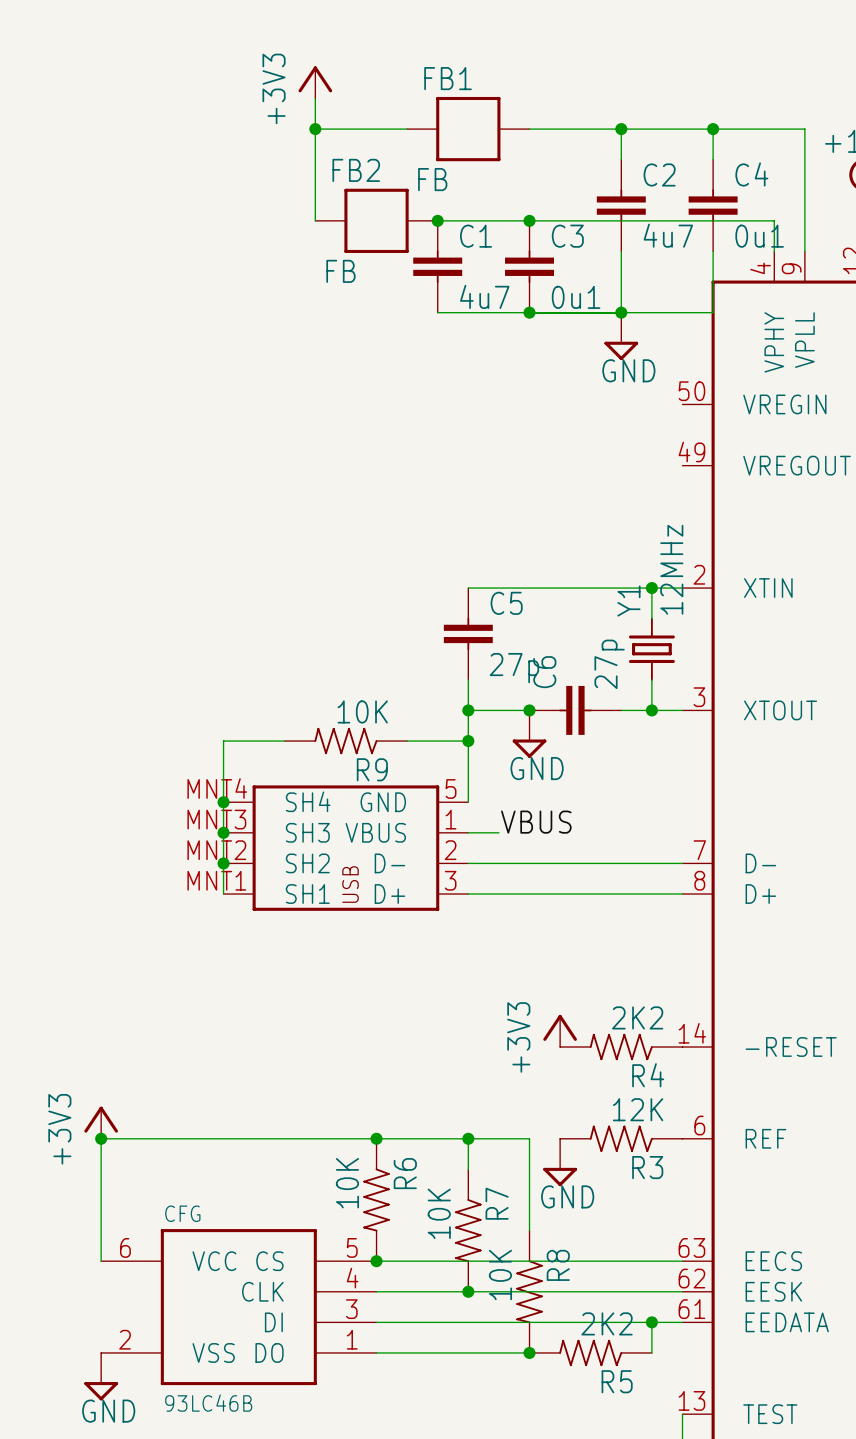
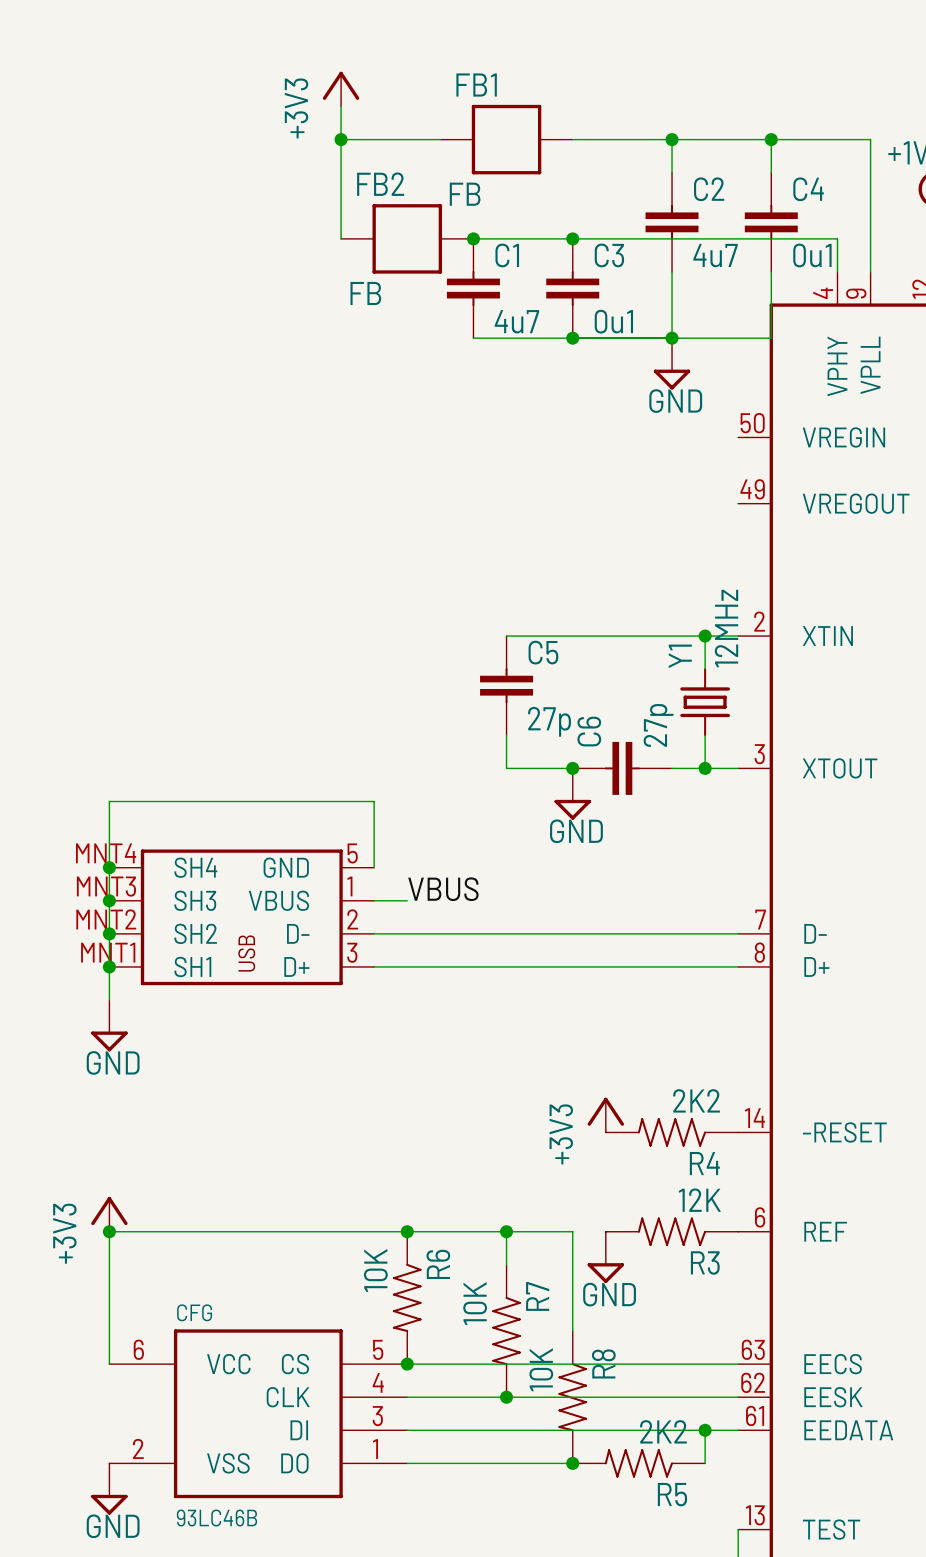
wire: (468, 710) (468, 802) -> none
junction: (468, 710) -> none
wire: (223, 741) (223, 894) -> (241, 801) (109, 801) (109, 1000)
wire: none -> (307, 801) (374, 801) (374, 867)
R9: 10K (345, 741) -> none
wire: (407, 741) (468, 741) -> none
junction: (468, 741) -> none
junction: none -> (109, 867)
junction: (223, 802) -> none
label position: VBUS (536, 822) -> VBUS (443, 889)
junction: none -> (109, 900)
junction: (223, 832) -> none
wire: (468, 832) (498, 832) -> (374, 900) (407, 900)
part position: (345, 848) -> (241, 917)
junction: none -> (109, 933)
junction: (223, 863) -> none
wire: none -> (374, 933) (506, 933)
junction: none -> (109, 966)
wire: none -> (374, 966) (506, 966)
power symbol: none -> GND (109, 1025)

